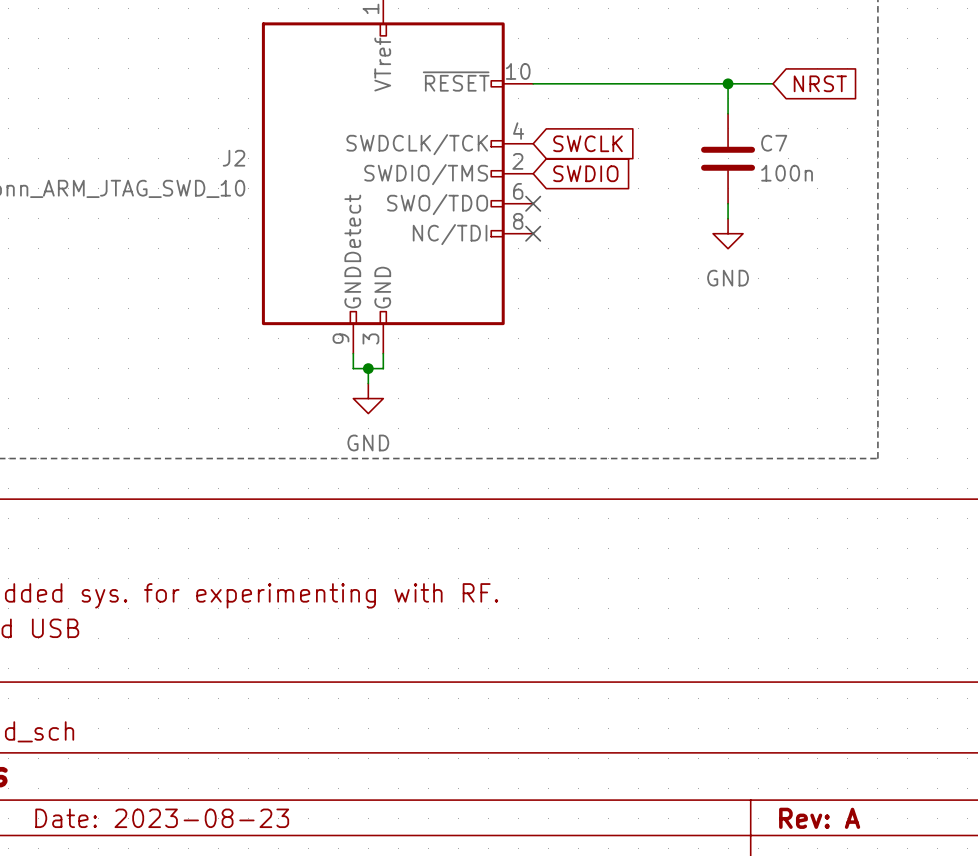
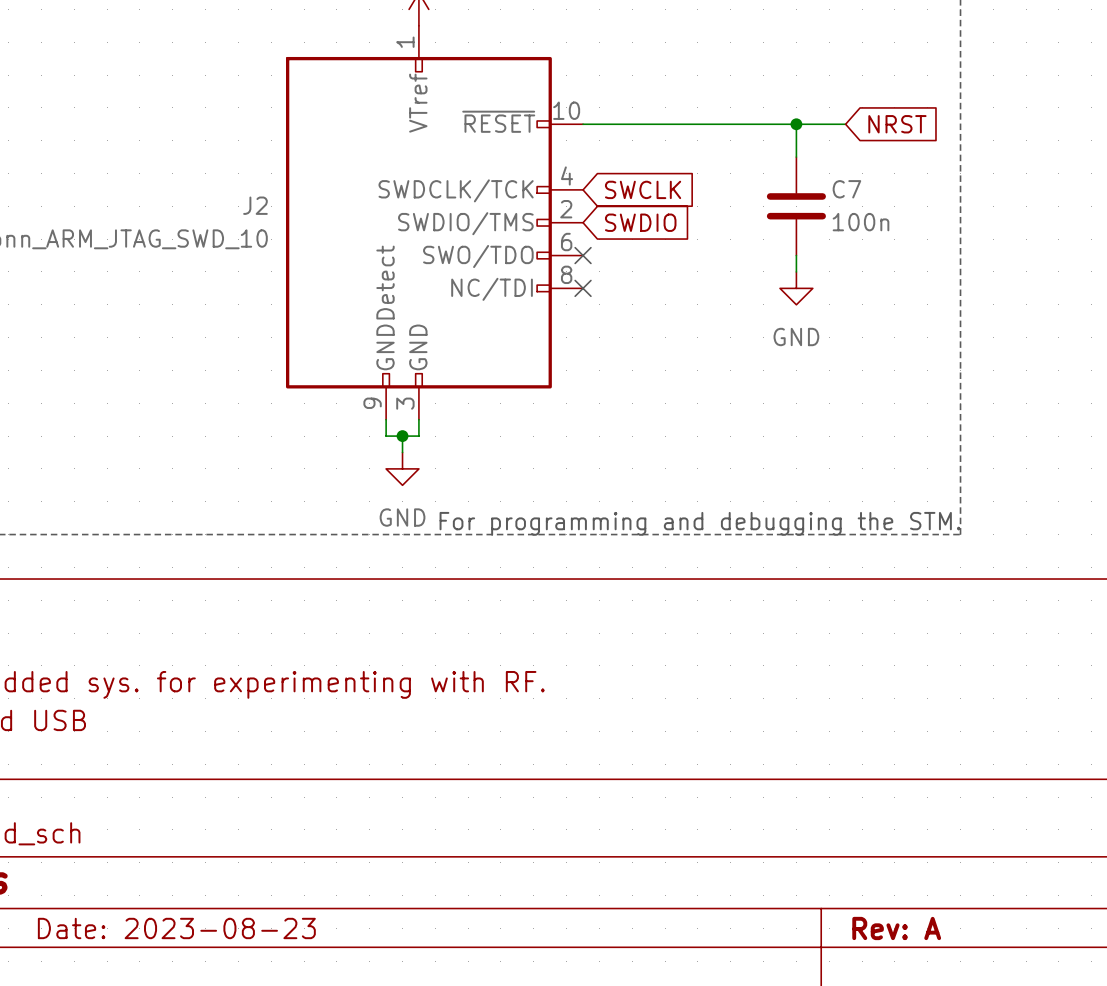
text: none -> For programming and debugging the STM. (700, 523)

